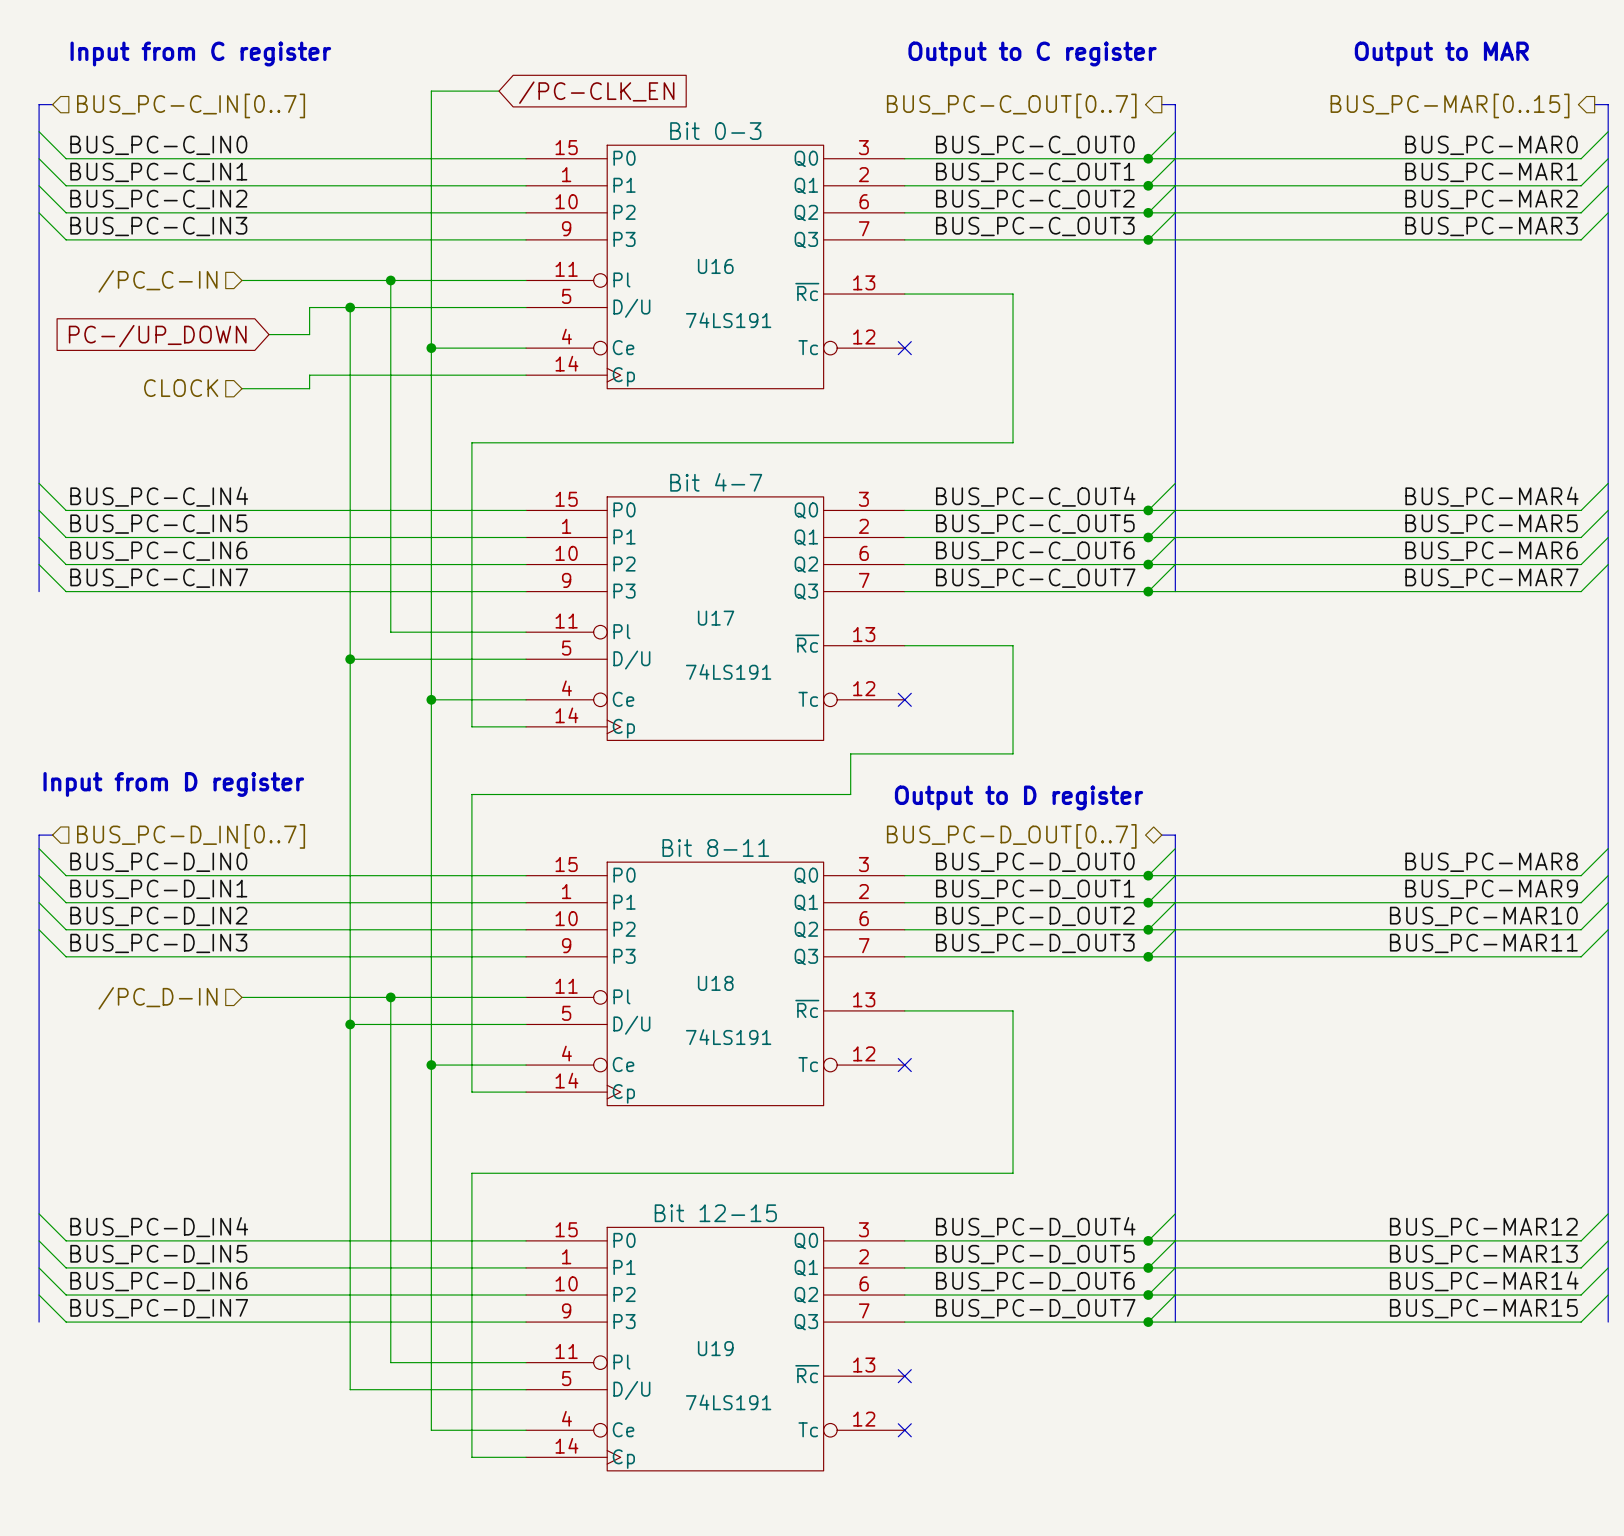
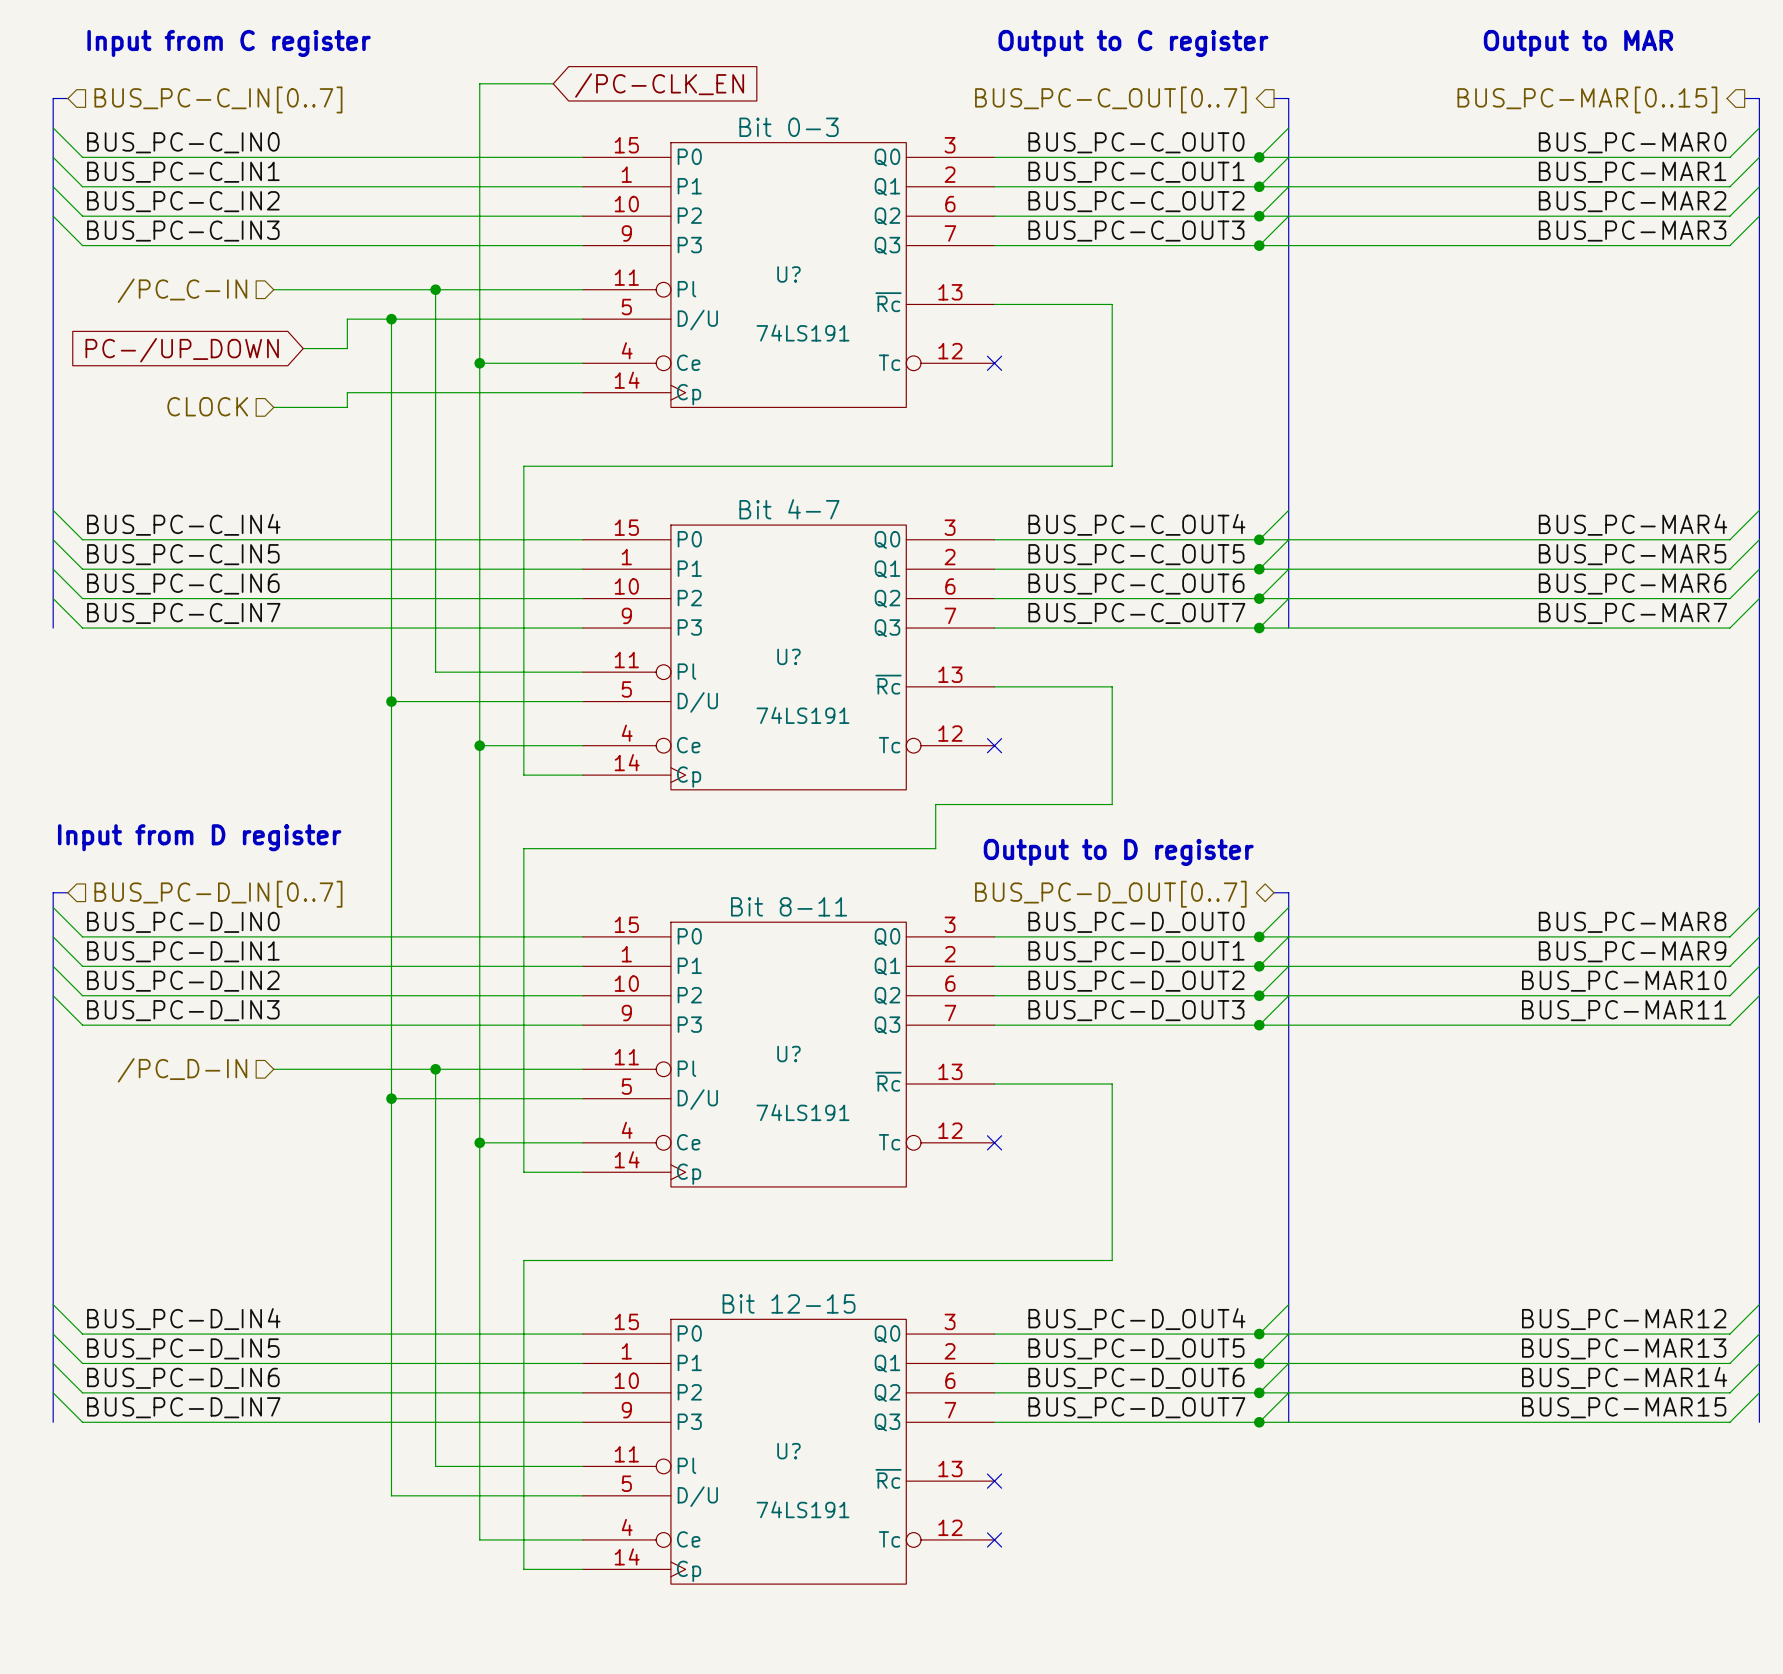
U16 name: U16 (715, 266) -> U? (788, 274)
U17 name: U17 (716, 618) -> U? (788, 656)
U18 name: U18 (715, 983) -> U? (788, 1054)
U19 name: U19 (715, 1348) -> U? (788, 1451)

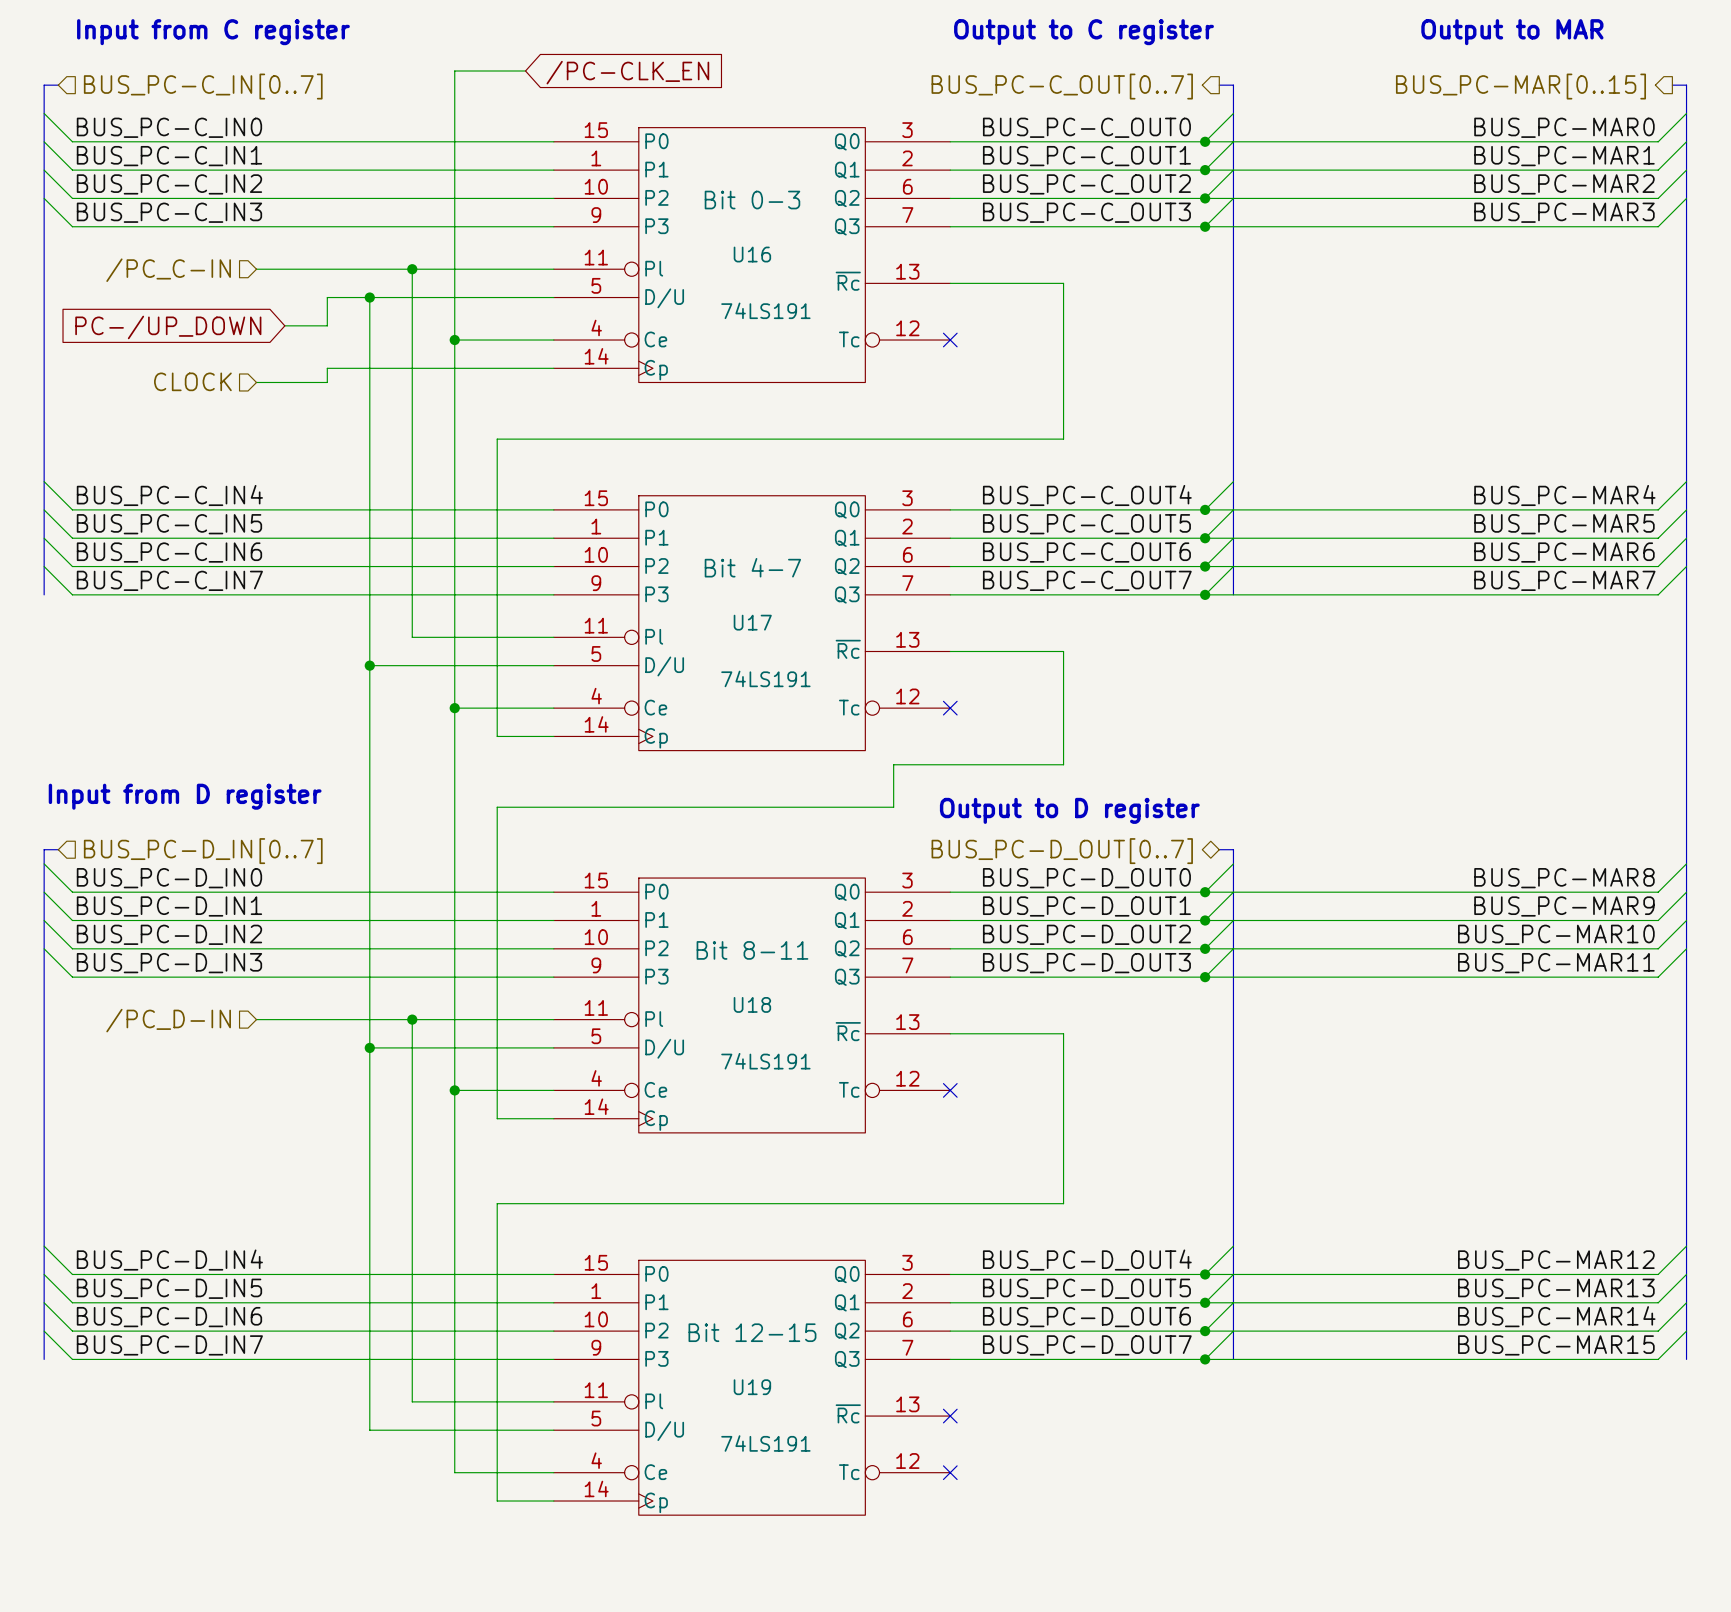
U? text position: Bit 0-3 (789, 127) -> Bit 0-3 (752, 200)
U? name: U? (788, 274) -> U16 (752, 254)
U? text position: Bit 4-7 (789, 509) -> Bit 4-7 (752, 567)
U? name: U? (788, 656) -> U17 (752, 622)
U? text position: Bit 8-11 (789, 906) -> Bit 8-11 (752, 950)
U? name: U? (788, 1054) -> U18 (752, 1004)
U? text position: Bit 12-15 (789, 1303) -> Bit 12-15 (752, 1332)
U? name: U? (788, 1451) -> U19 (752, 1387)

